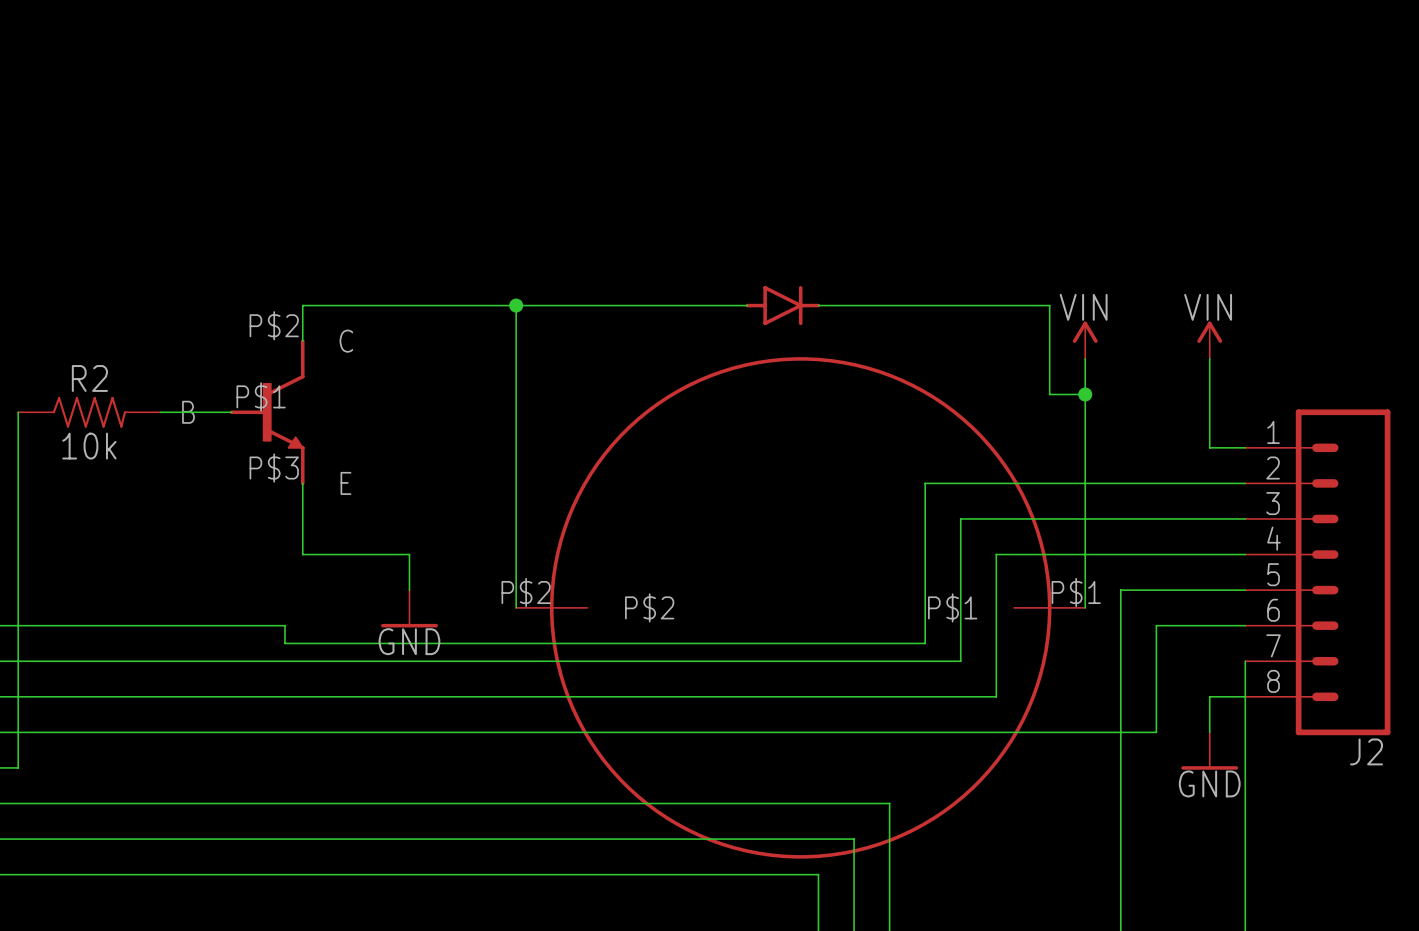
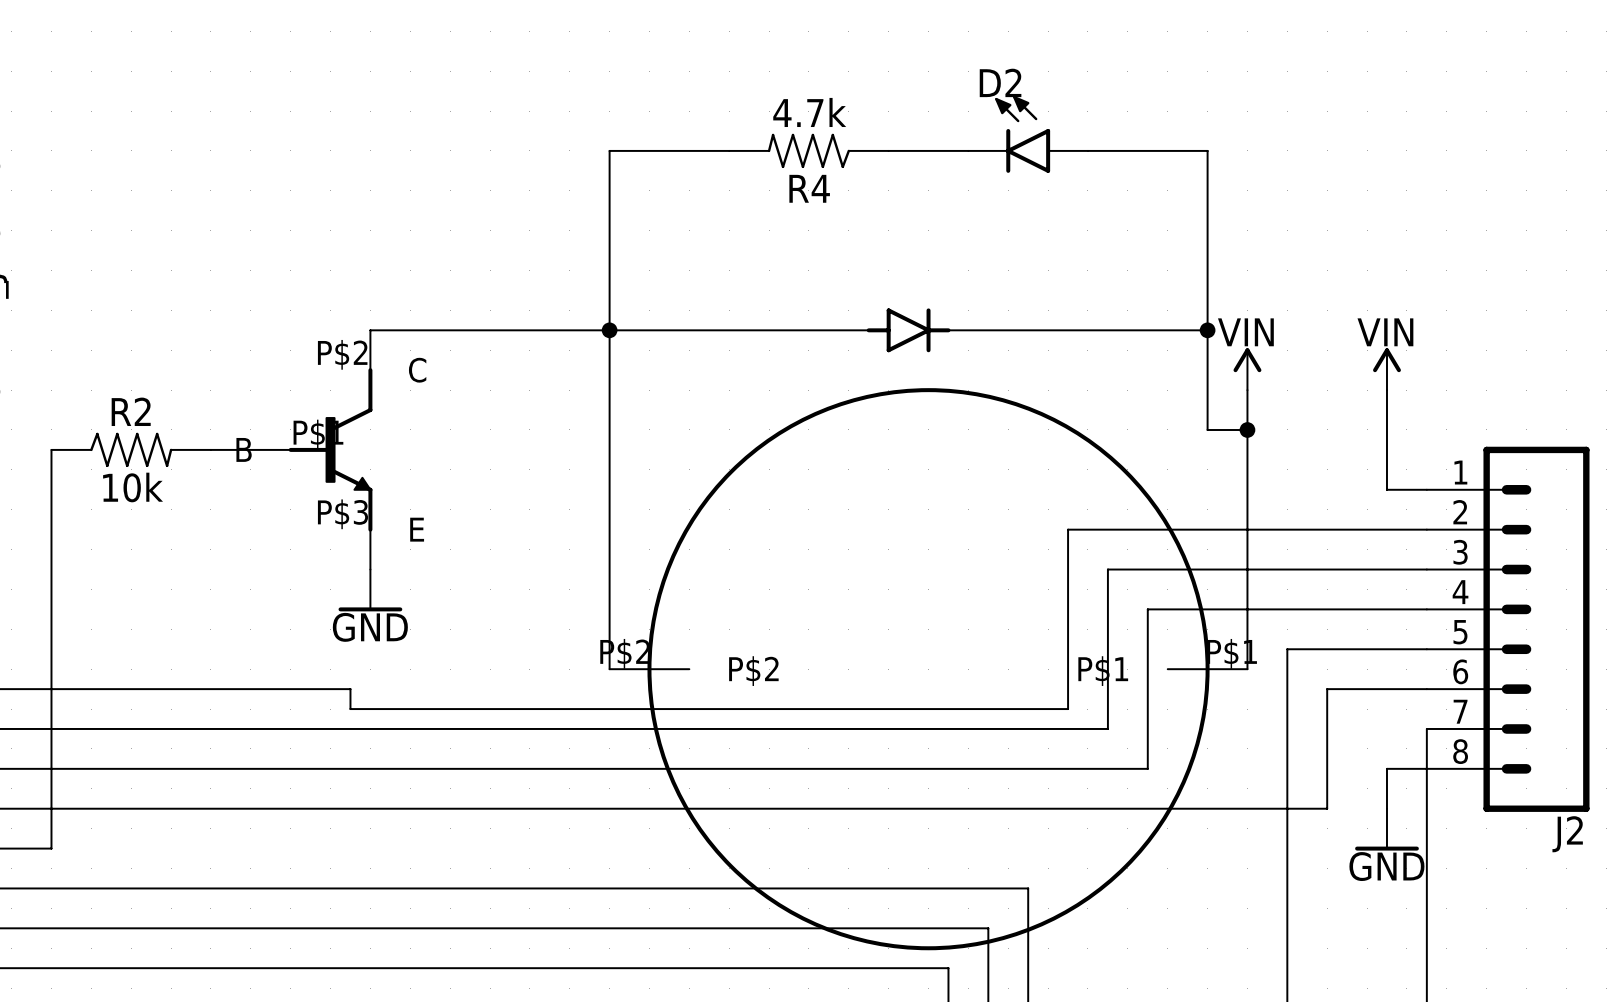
D2: none -> (1028, 134)
wire: none -> (729, 150) (609, 150) (609, 330)
R4: none -> 4.7k (808, 150)
wire: none -> (888, 150) (968, 150)
wire: none -> (1087, 150) (1207, 150) (1207, 330)
junction: none -> (1207, 330)
wire: (302, 518) (302, 554) (409, 554) (409, 590) -> none
power symbol position: GND (409, 608) -> GND (370, 590)

